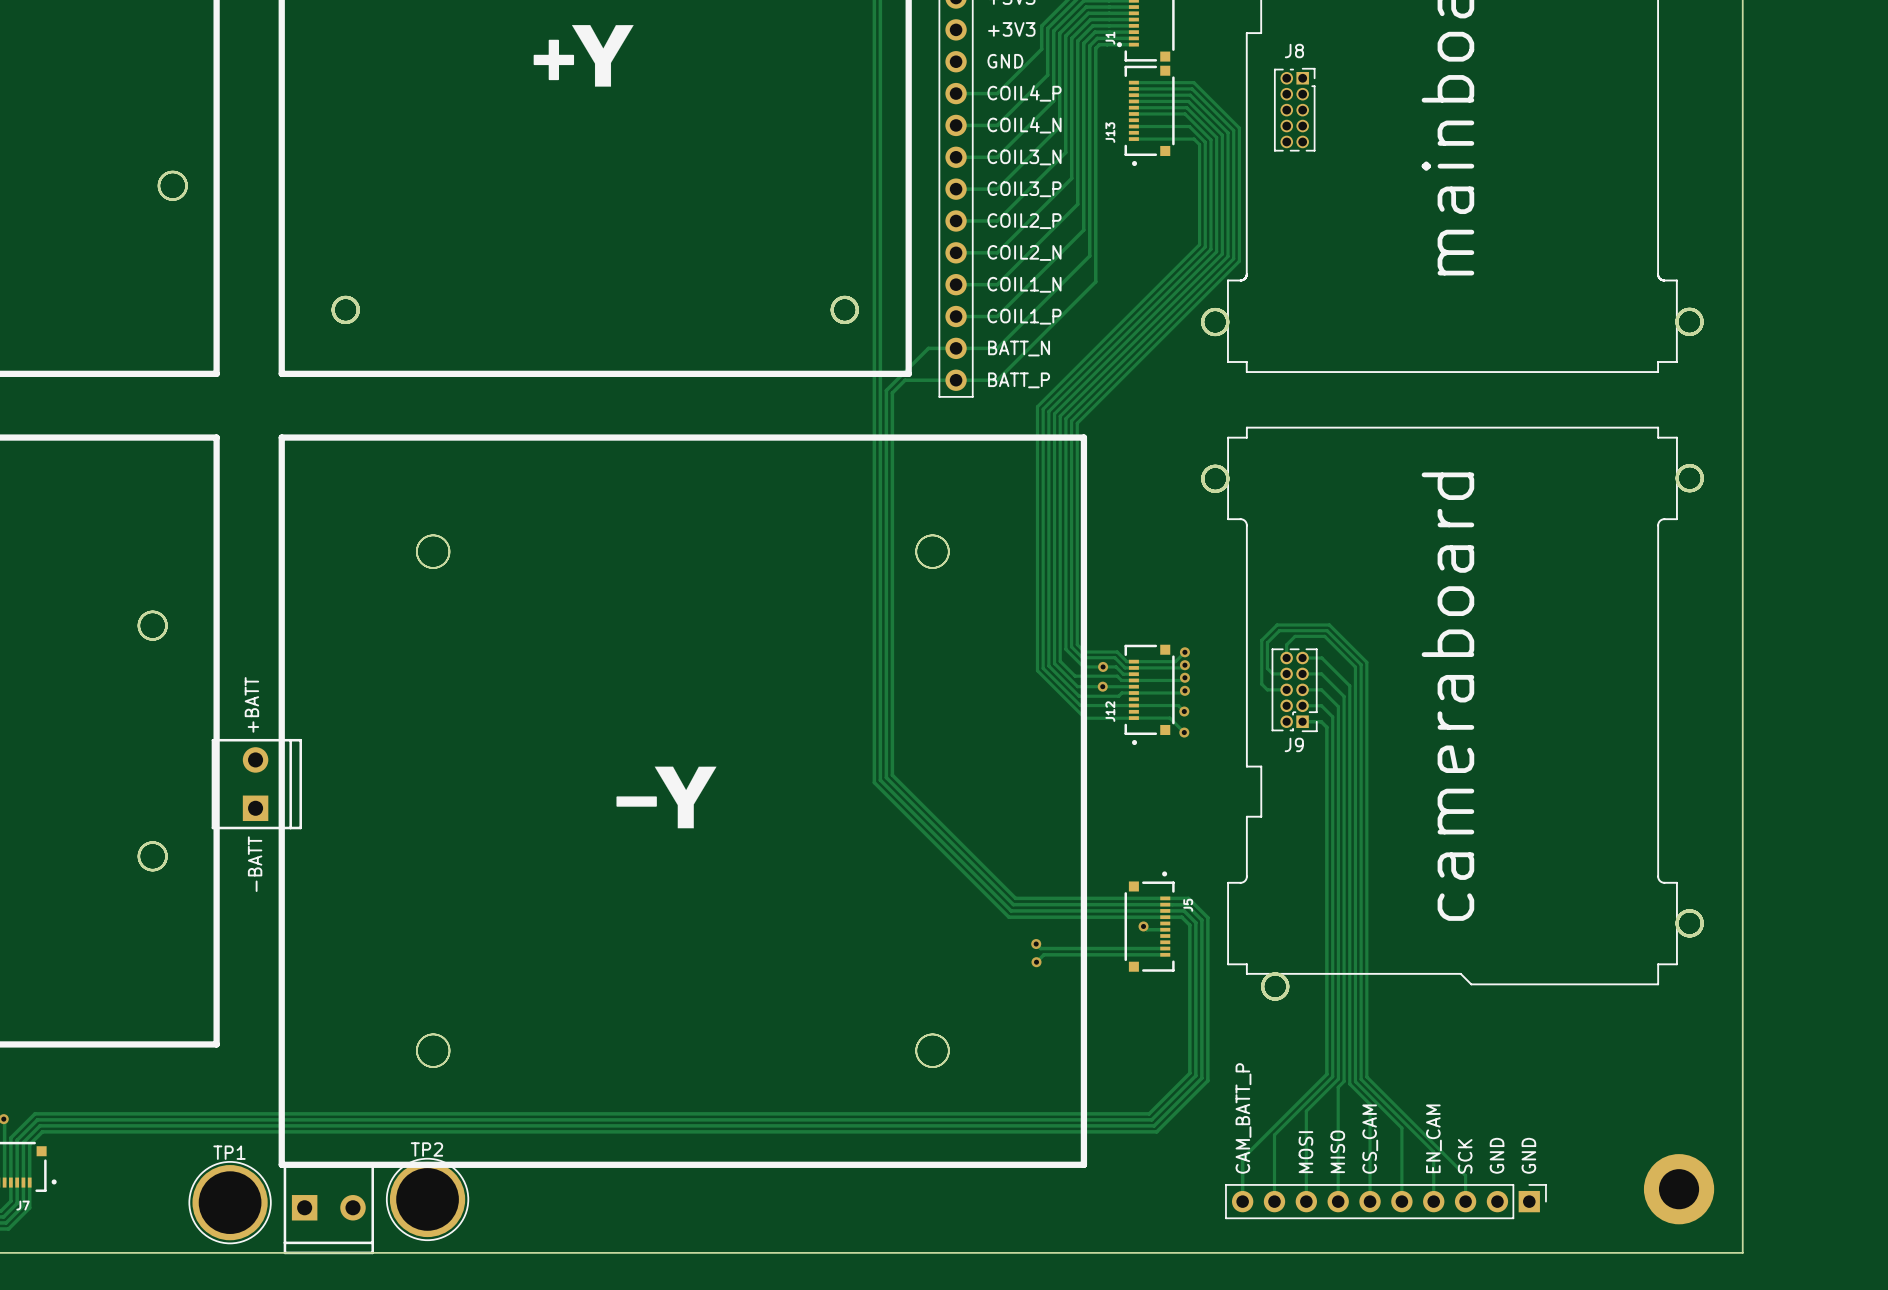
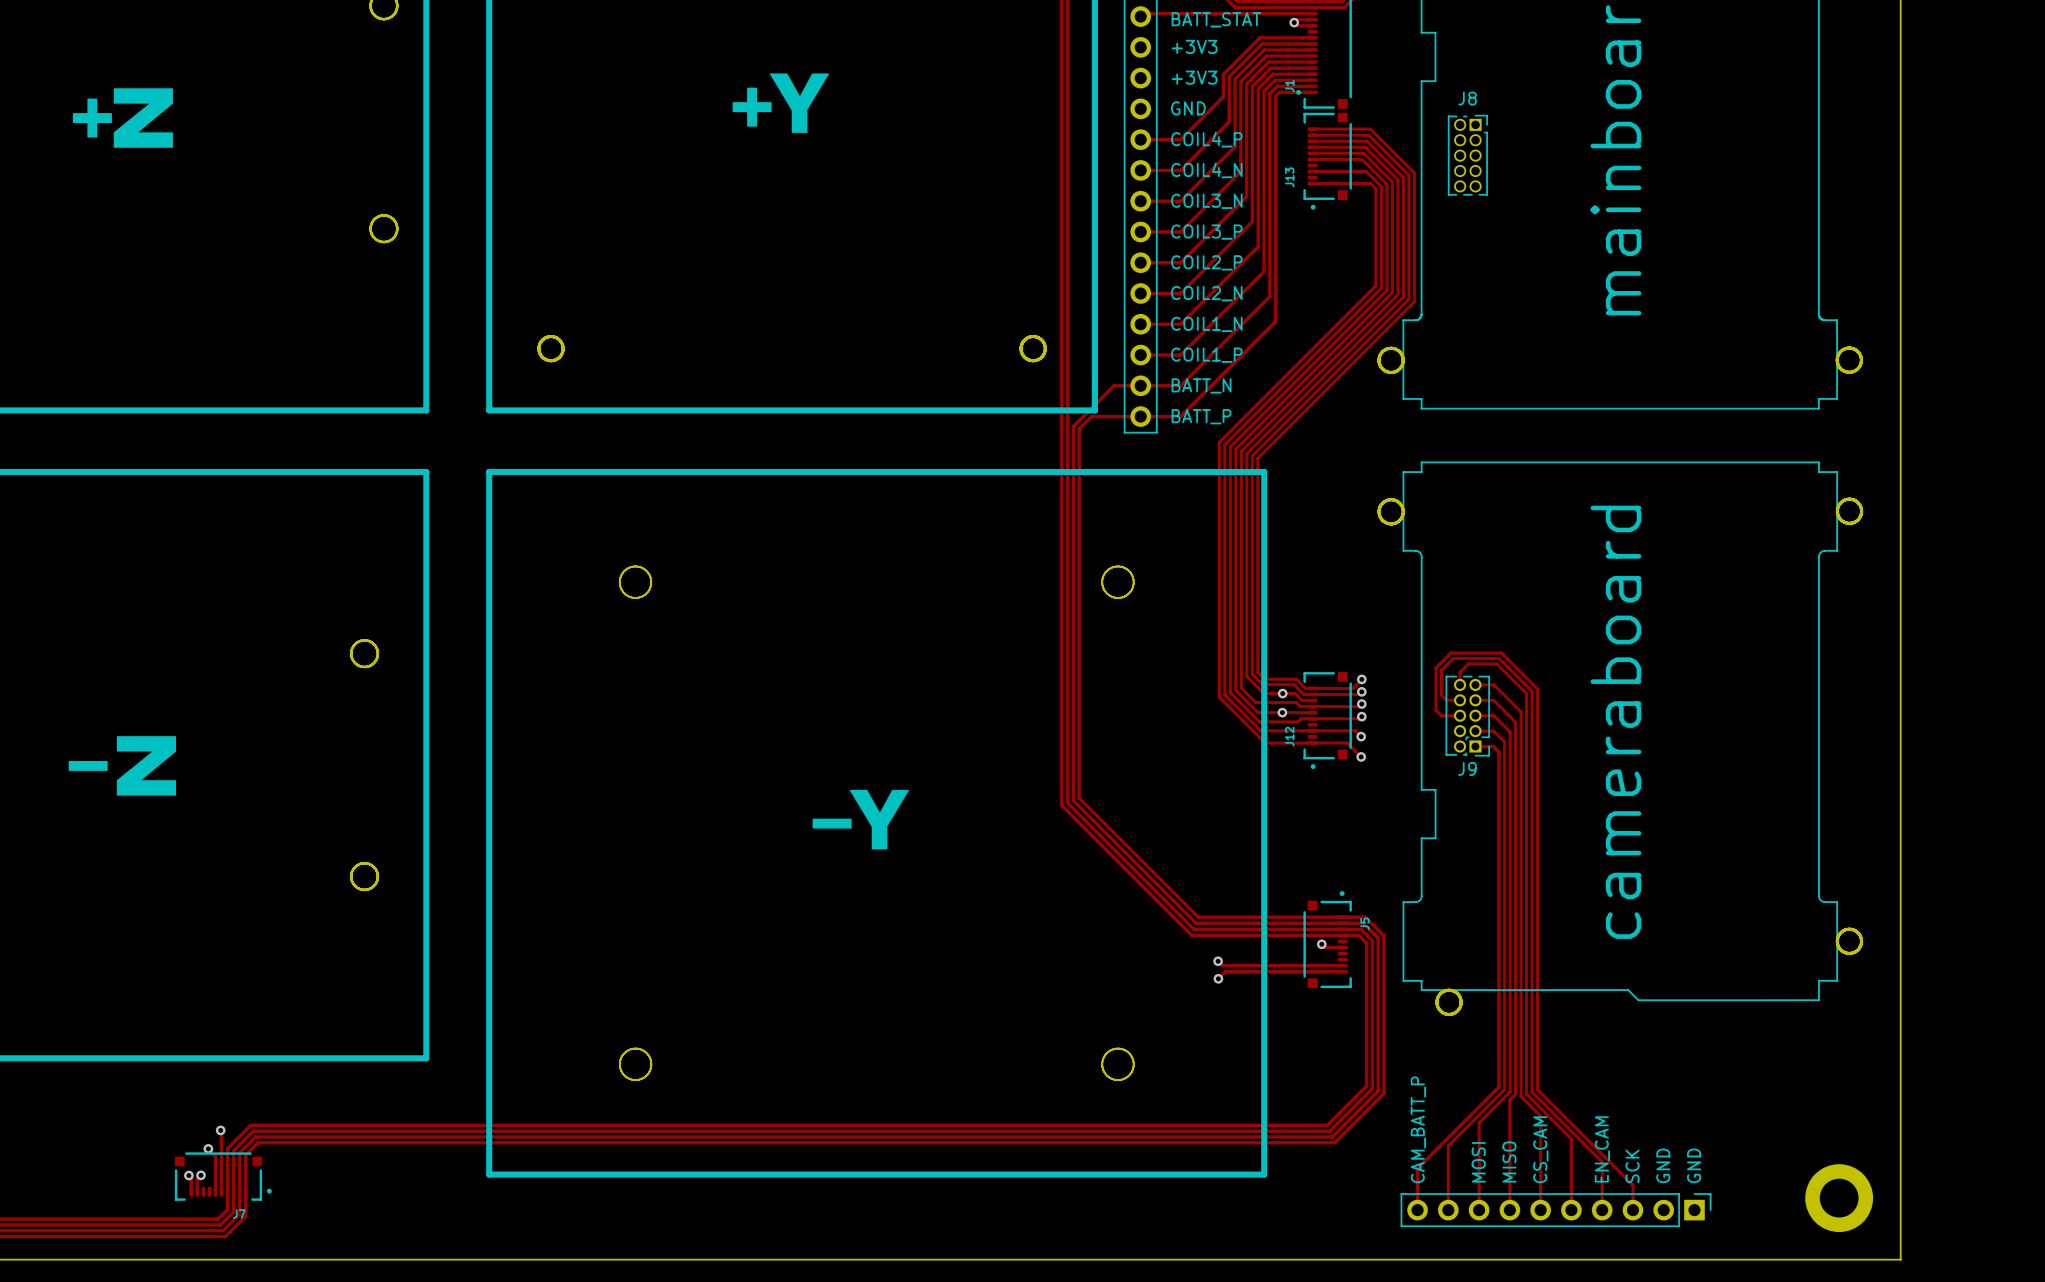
text: +BATT (251, 704) -> none
part: (256, 784) -> none
text: -BATT (255, 864) -> none
TP2: (427, 1199) -> none
TP1: (230, 1202) -> none
part: (328, 1209) -> none

